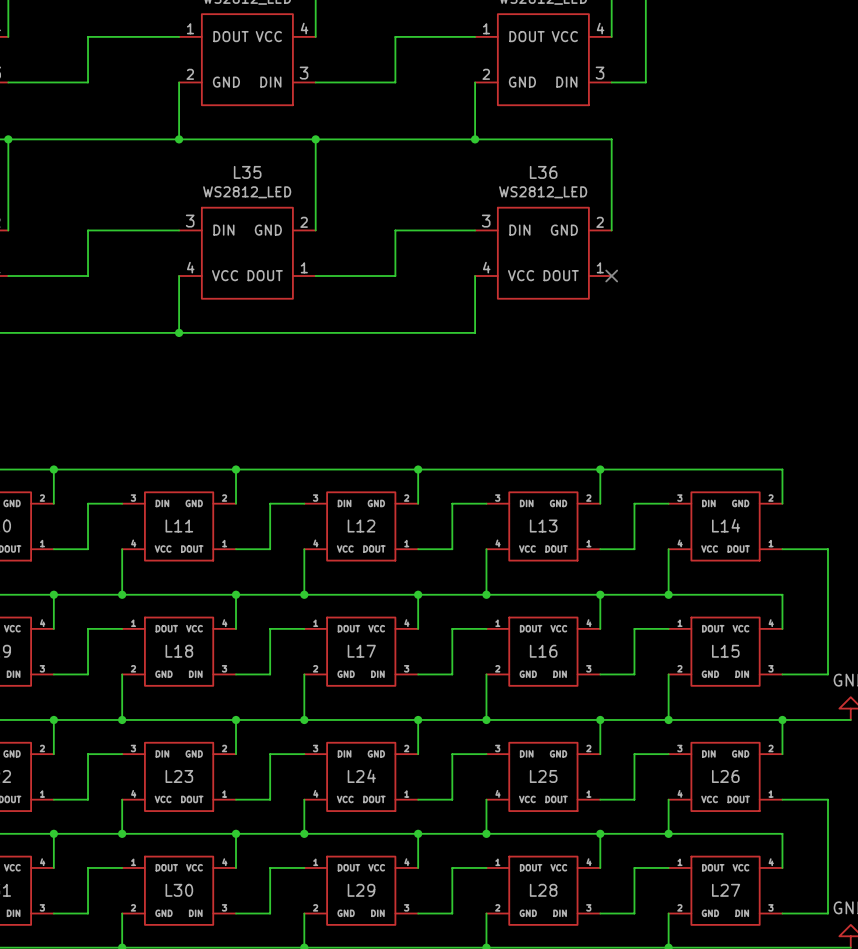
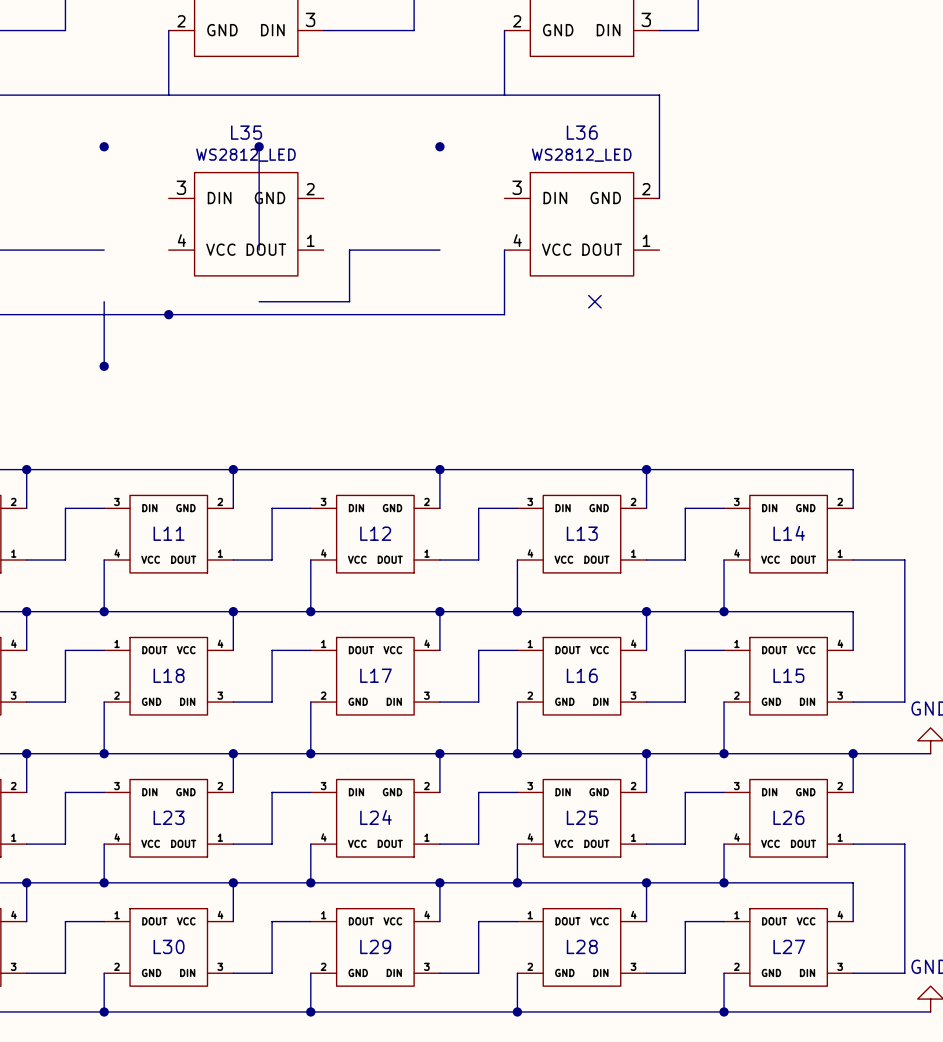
junction: (179, 139) -> none
wire: (315, 139) (315, 230) -> (259, 146) (259, 250)
junction: (315, 139) -> none
junction: (475, 139) -> none
junction: none -> (104, 146)
junction: none -> (259, 146)
junction: none -> (439, 146)
wire: (179, 230) (88, 230) (88, 275) -> (104, 250) (65, 250)
wire: (475, 230) (395, 230) (395, 275) -> (439, 250) (414, 250)
wire: (179, 275) (179, 332) -> (104, 301) (104, 366)
wire: (315, 275) (338, 275) -> (259, 301) (349, 301) (349, 250)
no-connect mark: (611, 275) -> none
no-connect mark: none -> (594, 301)
junction: none -> (104, 366)

